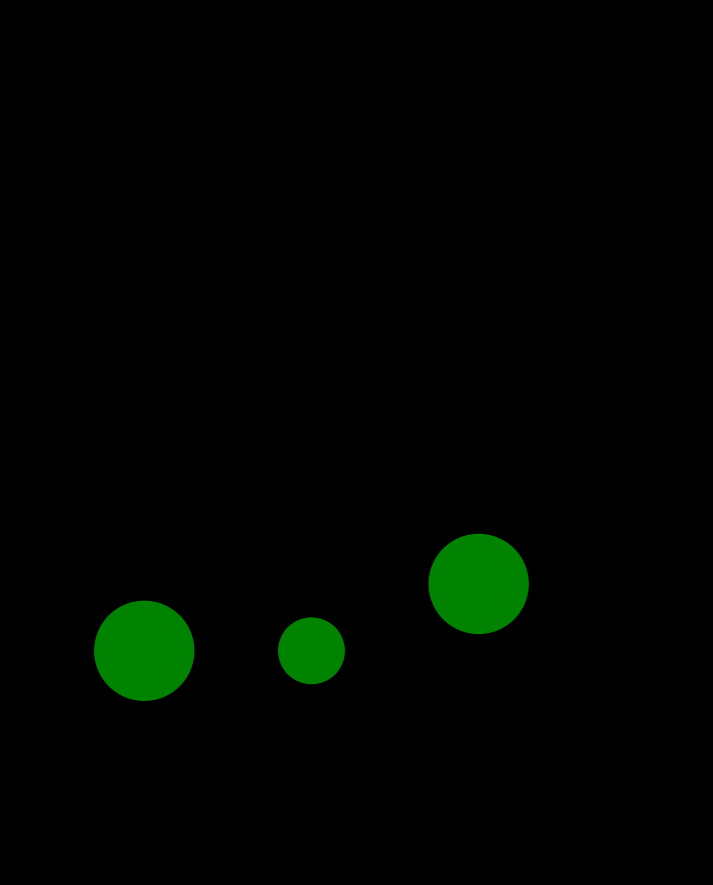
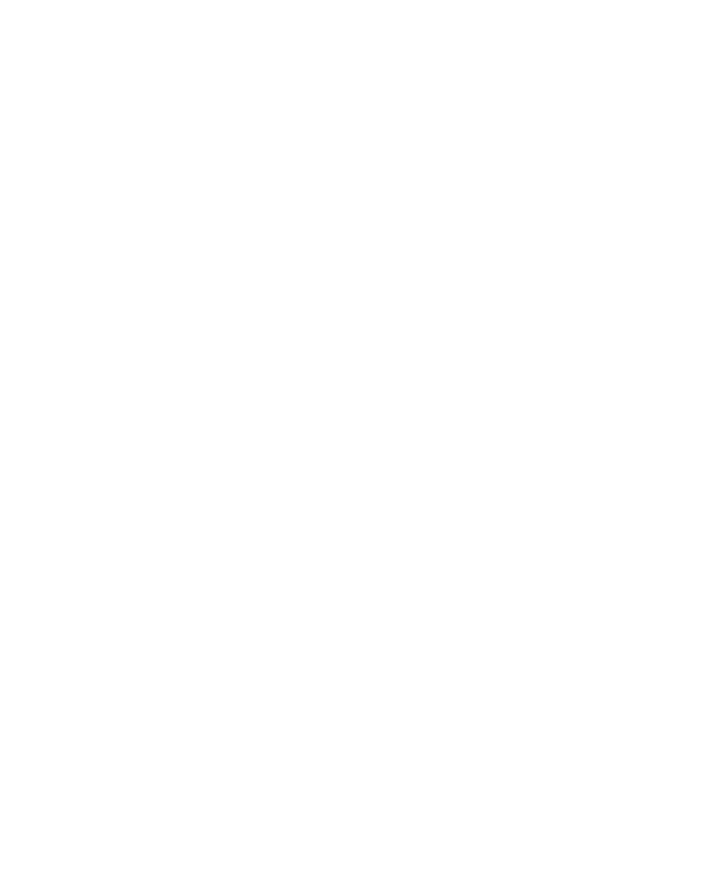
part: (478, 583) -> none
part: (144, 650) -> none
part: (311, 650) -> none

